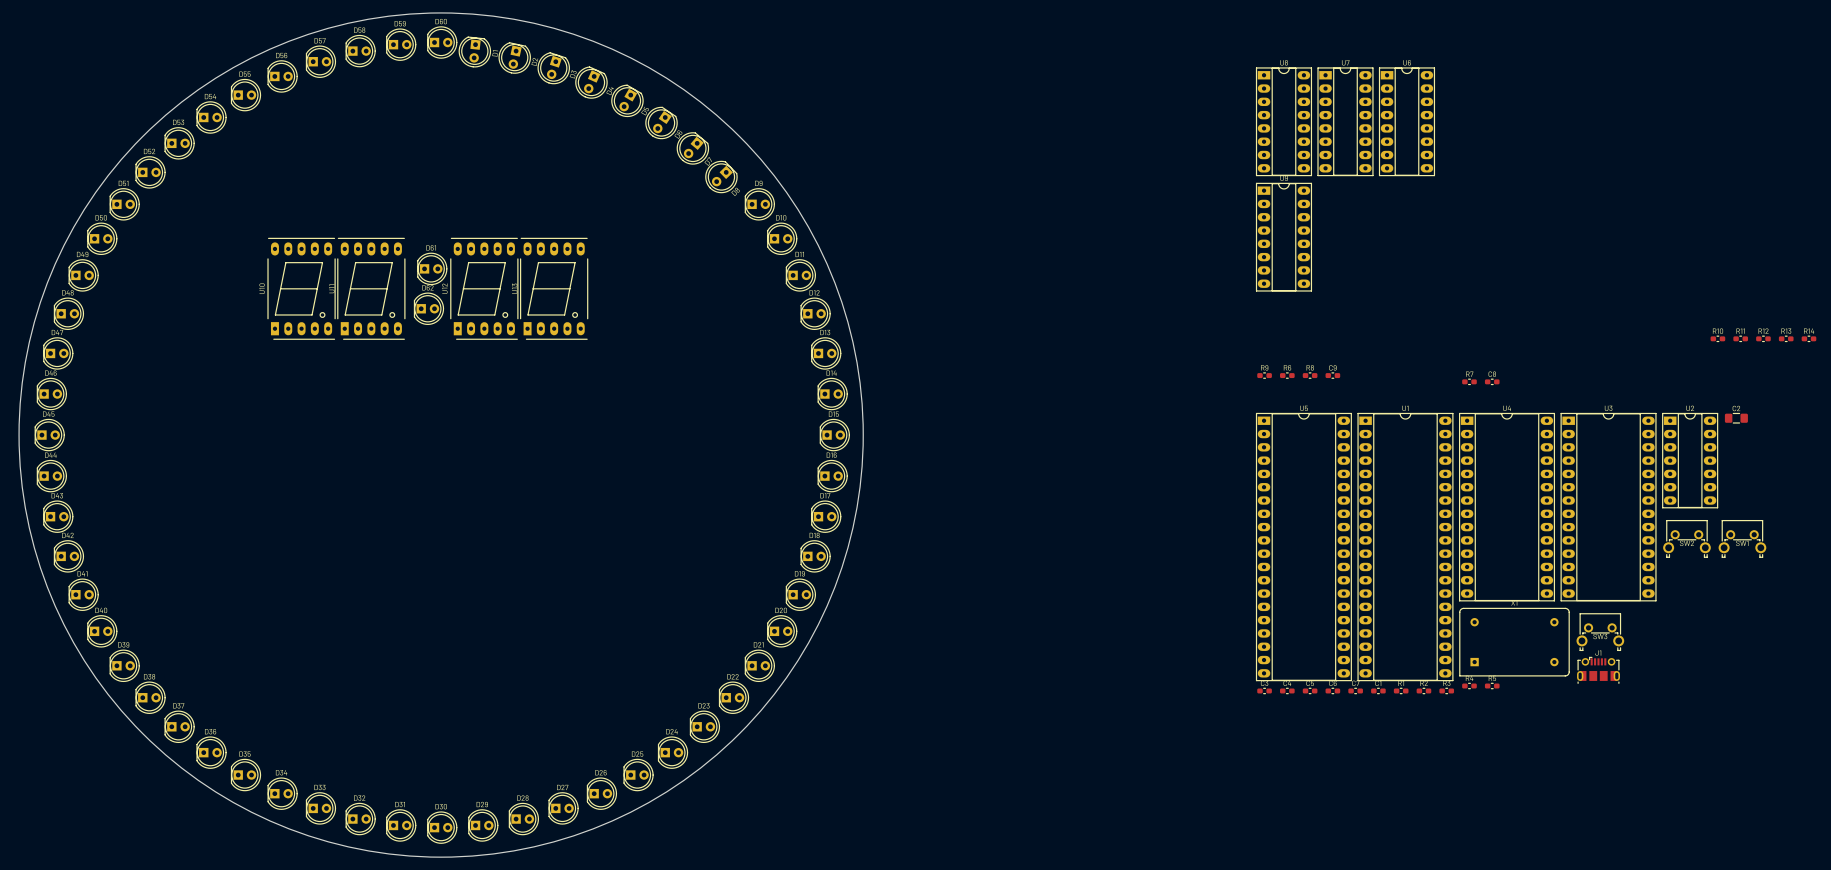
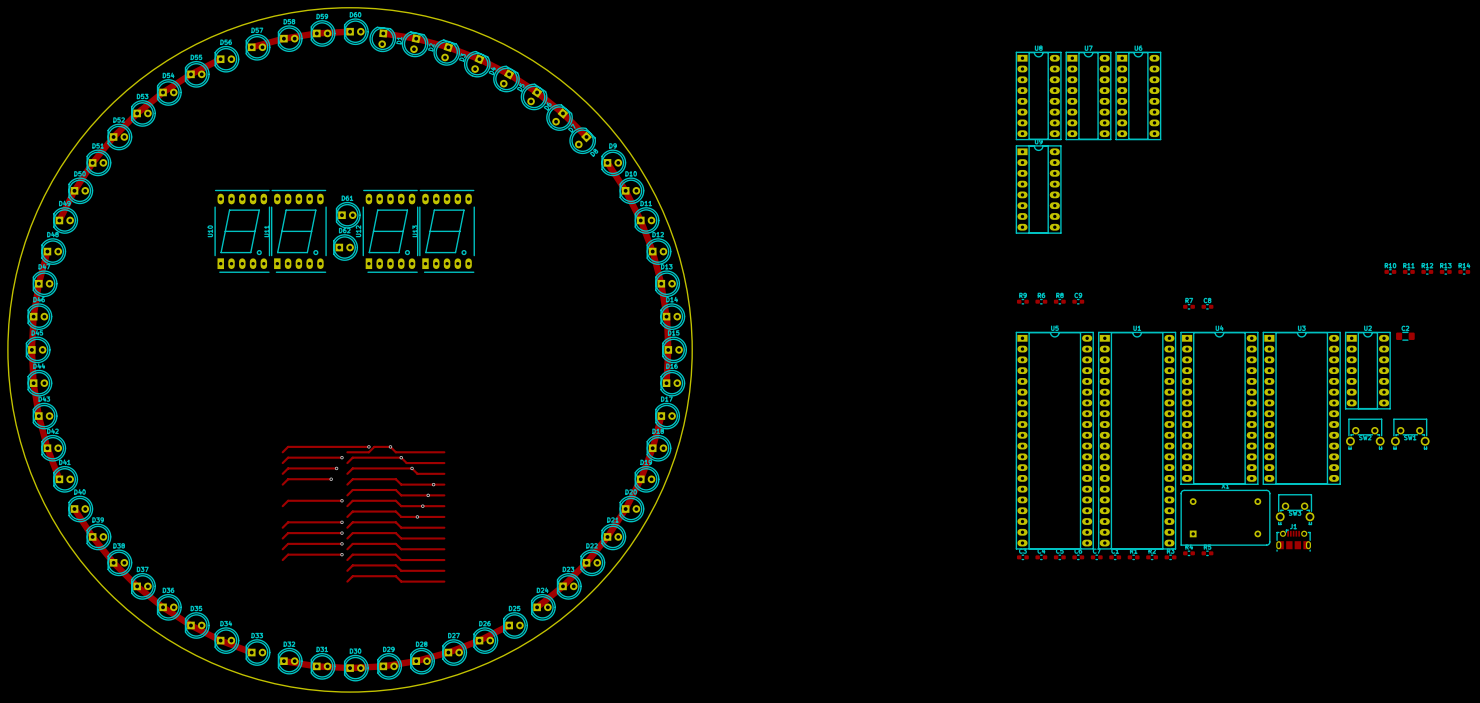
round board edge: none -> [7, 7, 693, 693]
round board edge: [18, 12, 864, 858] -> none
track: none -> (350, 31) (316, 33) (283, 38)
track: none -> (383, 33) (416, 38) (448, 47) (479, 59) (509, 74) (537, 92) (562, 113) (586, 136)
track: none -> (283, 38) (251, 47)
track: none -> (220, 59) (190, 74) (163, 92) (137, 113) (113, 136) (92, 162) (74, 190) (59, 220)
track: none -> (607, 162) (625, 190) (640, 220) (652, 251) (661, 283) (667, 316) (666, 383)
track: none -> (47, 251) (38, 283) (33, 316) (31, 349) (33, 383) (38, 416) (47, 448) (59, 479)
track: none -> (661, 416) (652, 448) (640, 479) (625, 509) (607, 536) (586, 562) (562, 586) (537, 607)
track: none -> (368, 446) (288, 446) (282, 452)
via: none -> (368, 446)
via: none -> (390, 446)
track: none -> (347, 452) (368, 452) (374, 446) (390, 446) (395, 452) (444, 452)
track: none -> (341, 457) (288, 457) (282, 463)
via: none -> (341, 457)
via: none -> (401, 457)
track: none -> (347, 463) (352, 457) (401, 457) (406, 463) (444, 463)
track: none -> (336, 468) (288, 468) (282, 473)
via: none -> (336, 468)
via: none -> (412, 468)
track: none -> (347, 473) (352, 468) (412, 468) (417, 473) (444, 473)
track: none -> (331, 479) (288, 479) (282, 484)
via: none -> (331, 479)
track: none -> (347, 484) (352, 479) (395, 479) (401, 484) (444, 484)
via: none -> (433, 484)
track: none -> (347, 495) (352, 490) (395, 490) (401, 495) (444, 495)
via: none -> (428, 495)
track: none -> (341, 500) (288, 500) (282, 506)
via: none -> (341, 500)
track: none -> (347, 506) (352, 500) (395, 500) (401, 506) (444, 506)
via: none -> (422, 506)
track: none -> (74, 509) (92, 536) (113, 562) (137, 586) (163, 607) (190, 625) (220, 640) (251, 652)
track: none -> (347, 516) (352, 511) (395, 511) (401, 516) (444, 516)
via: none -> (417, 516)
track: none -> (341, 522) (288, 522) (282, 527)
via: none -> (341, 522)
track: none -> (347, 527) (352, 522) (395, 522) (401, 527) (444, 527)
track: none -> (341, 533) (288, 533) (282, 538)
via: none -> (341, 533)
track: none -> (347, 538) (352, 533) (395, 533) (401, 538) (444, 538)
track: none -> (341, 543) (288, 543) (282, 549)
via: none -> (341, 543)
track: none -> (347, 549) (352, 543) (395, 543) (401, 549) (444, 549)
track: none -> (341, 554) (288, 554) (282, 560)
via: none -> (341, 554)
track: none -> (347, 560) (352, 554) (395, 554) (401, 560) (444, 560)
track: none -> (347, 570) (352, 565) (395, 565) (401, 570) (444, 570)
track: none -> (347, 581) (352, 576) (395, 576) (401, 581) (444, 581)
track: none -> (509, 625) (479, 640) (448, 652) (416, 661) (383, 666) (350, 668) (316, 666) (283, 661)

